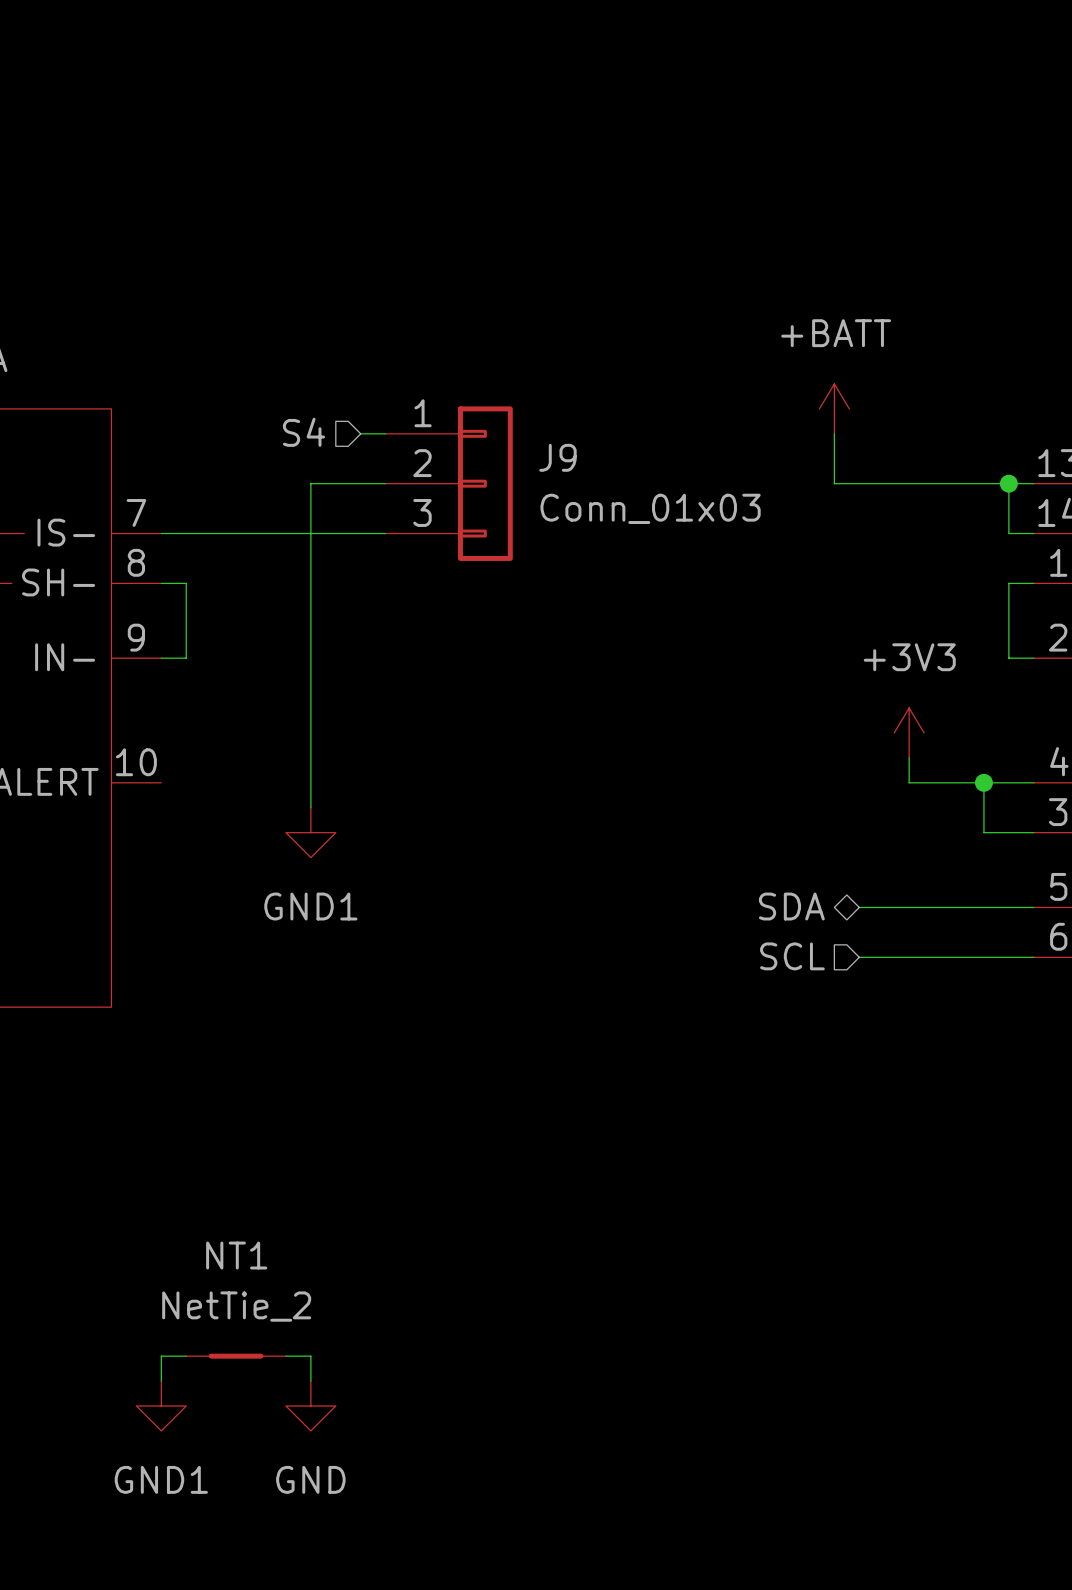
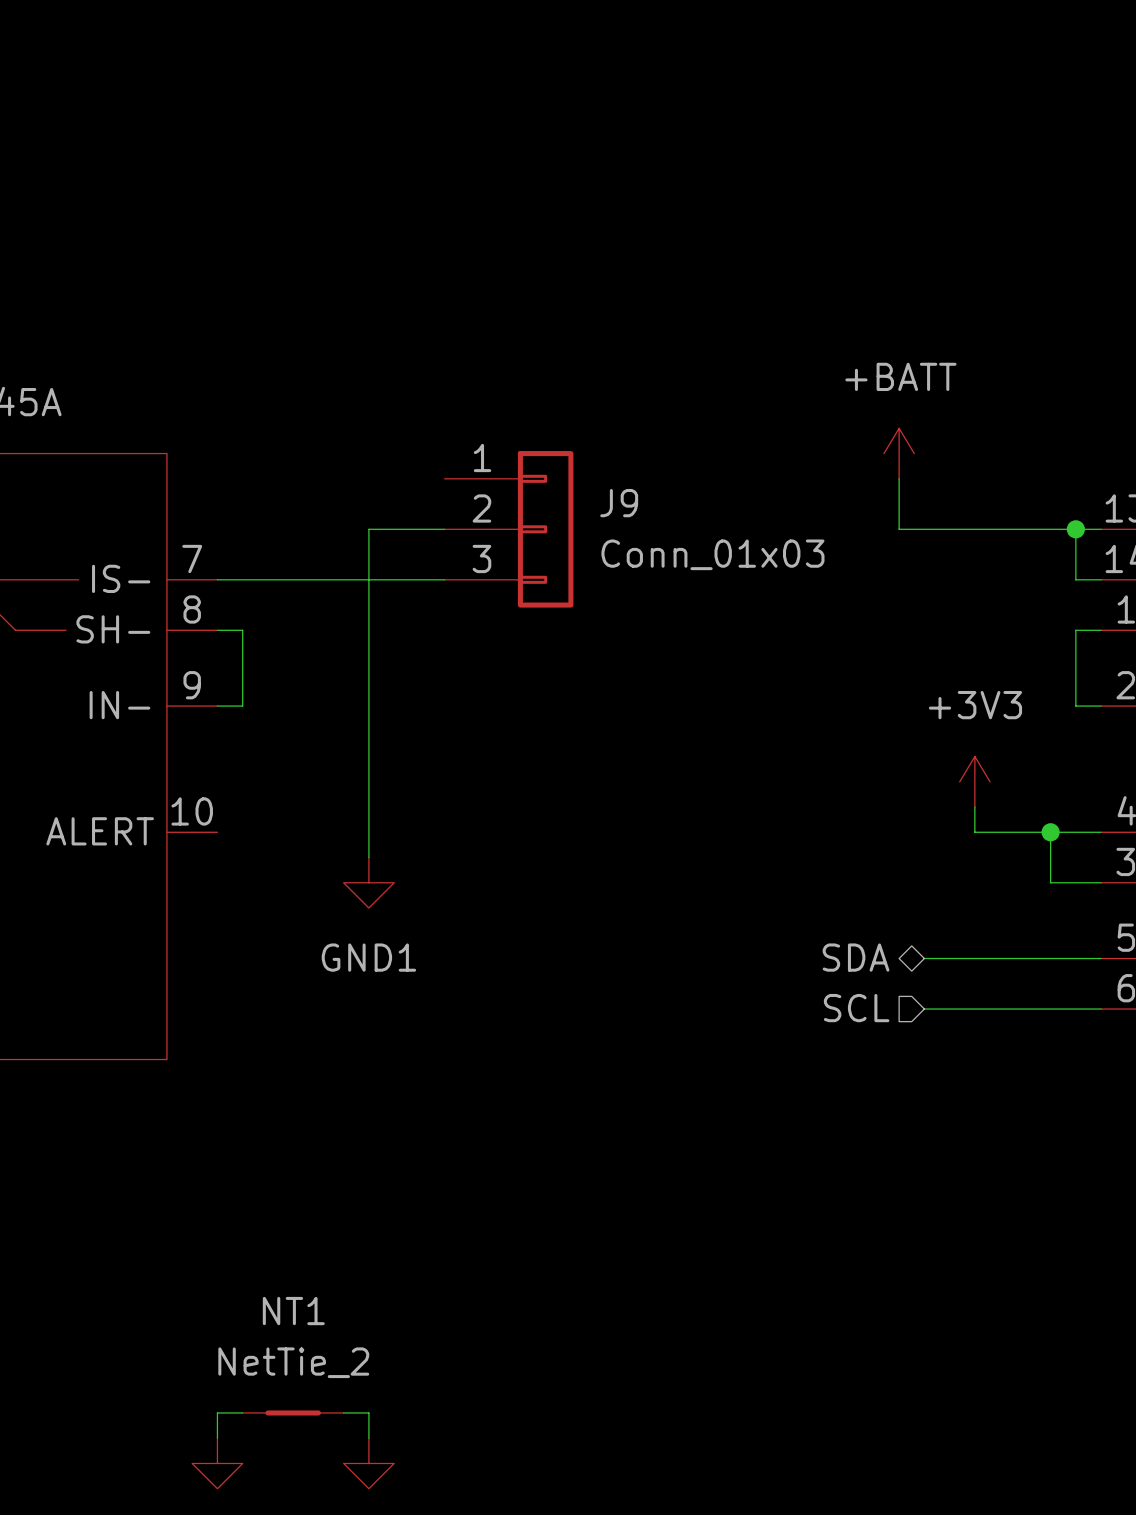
hierarchical label: S4 (303, 432) -> none
wire: (360, 433) (385, 433) -> none

